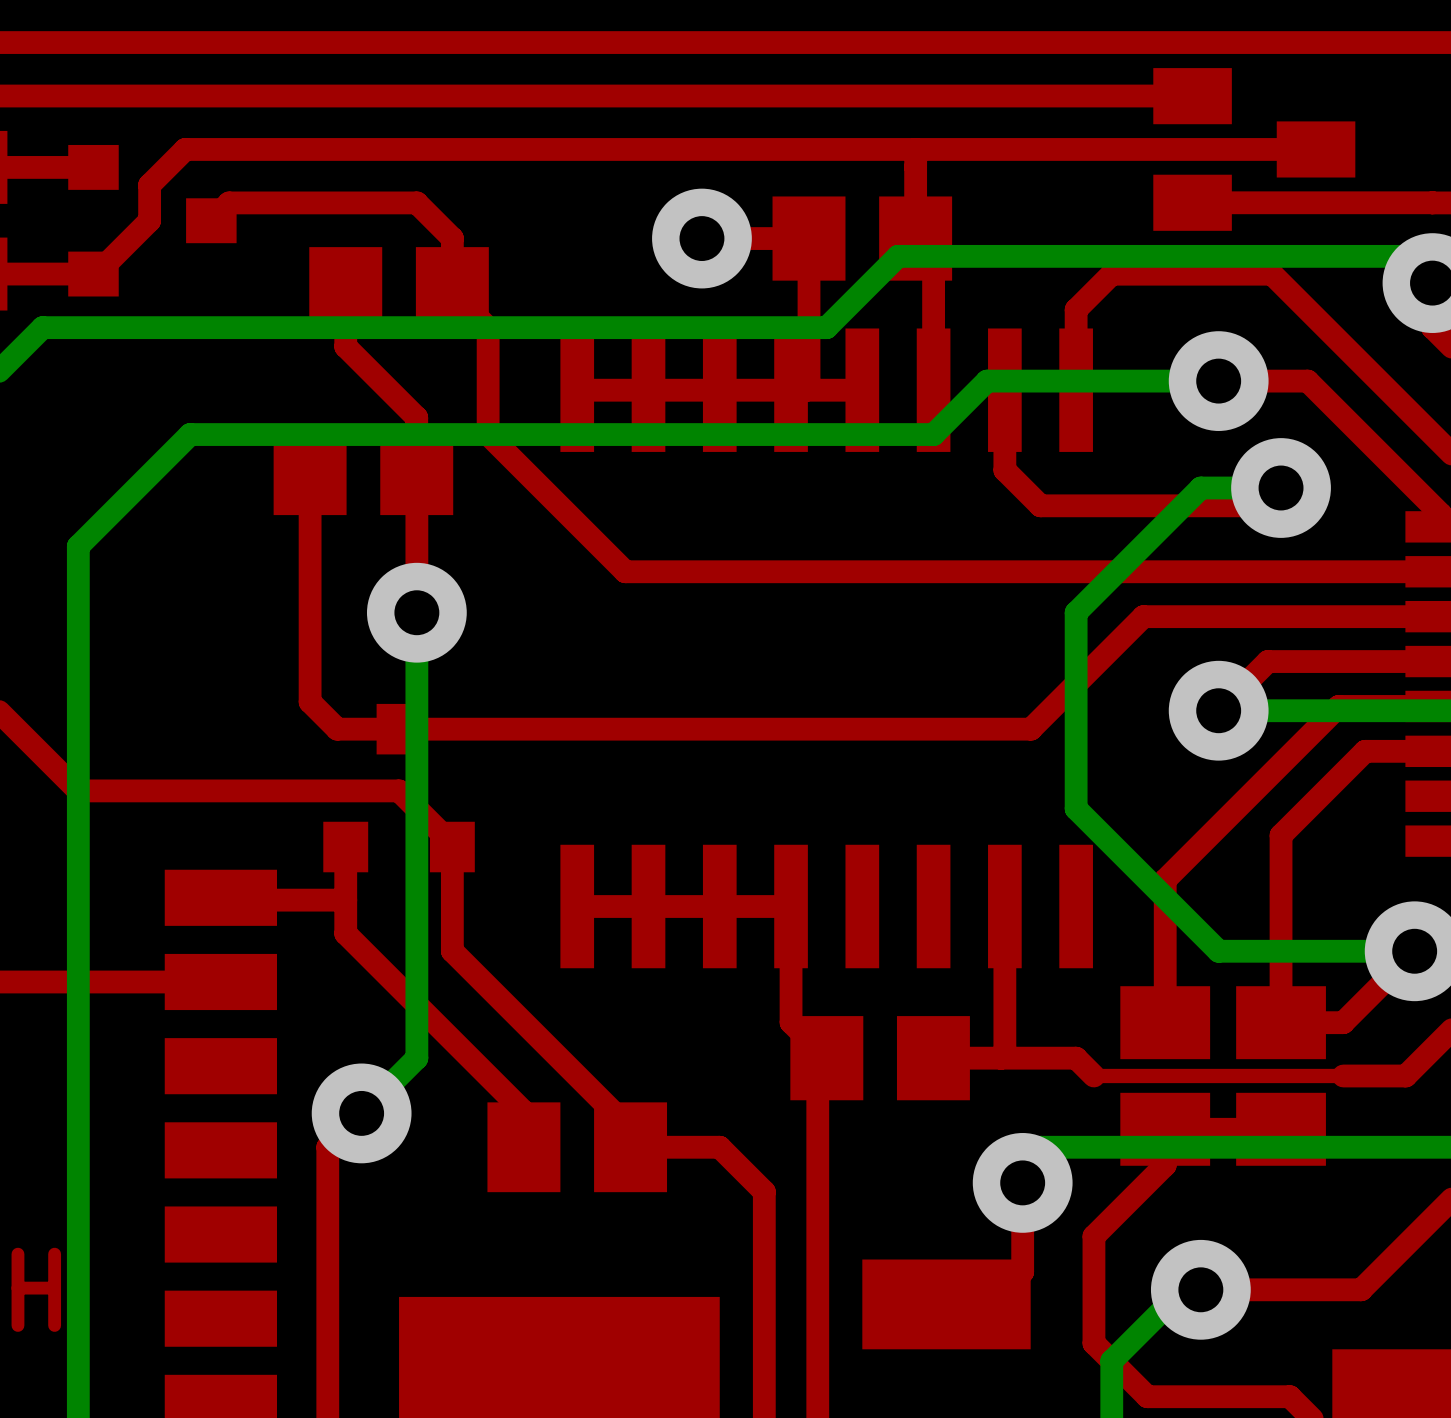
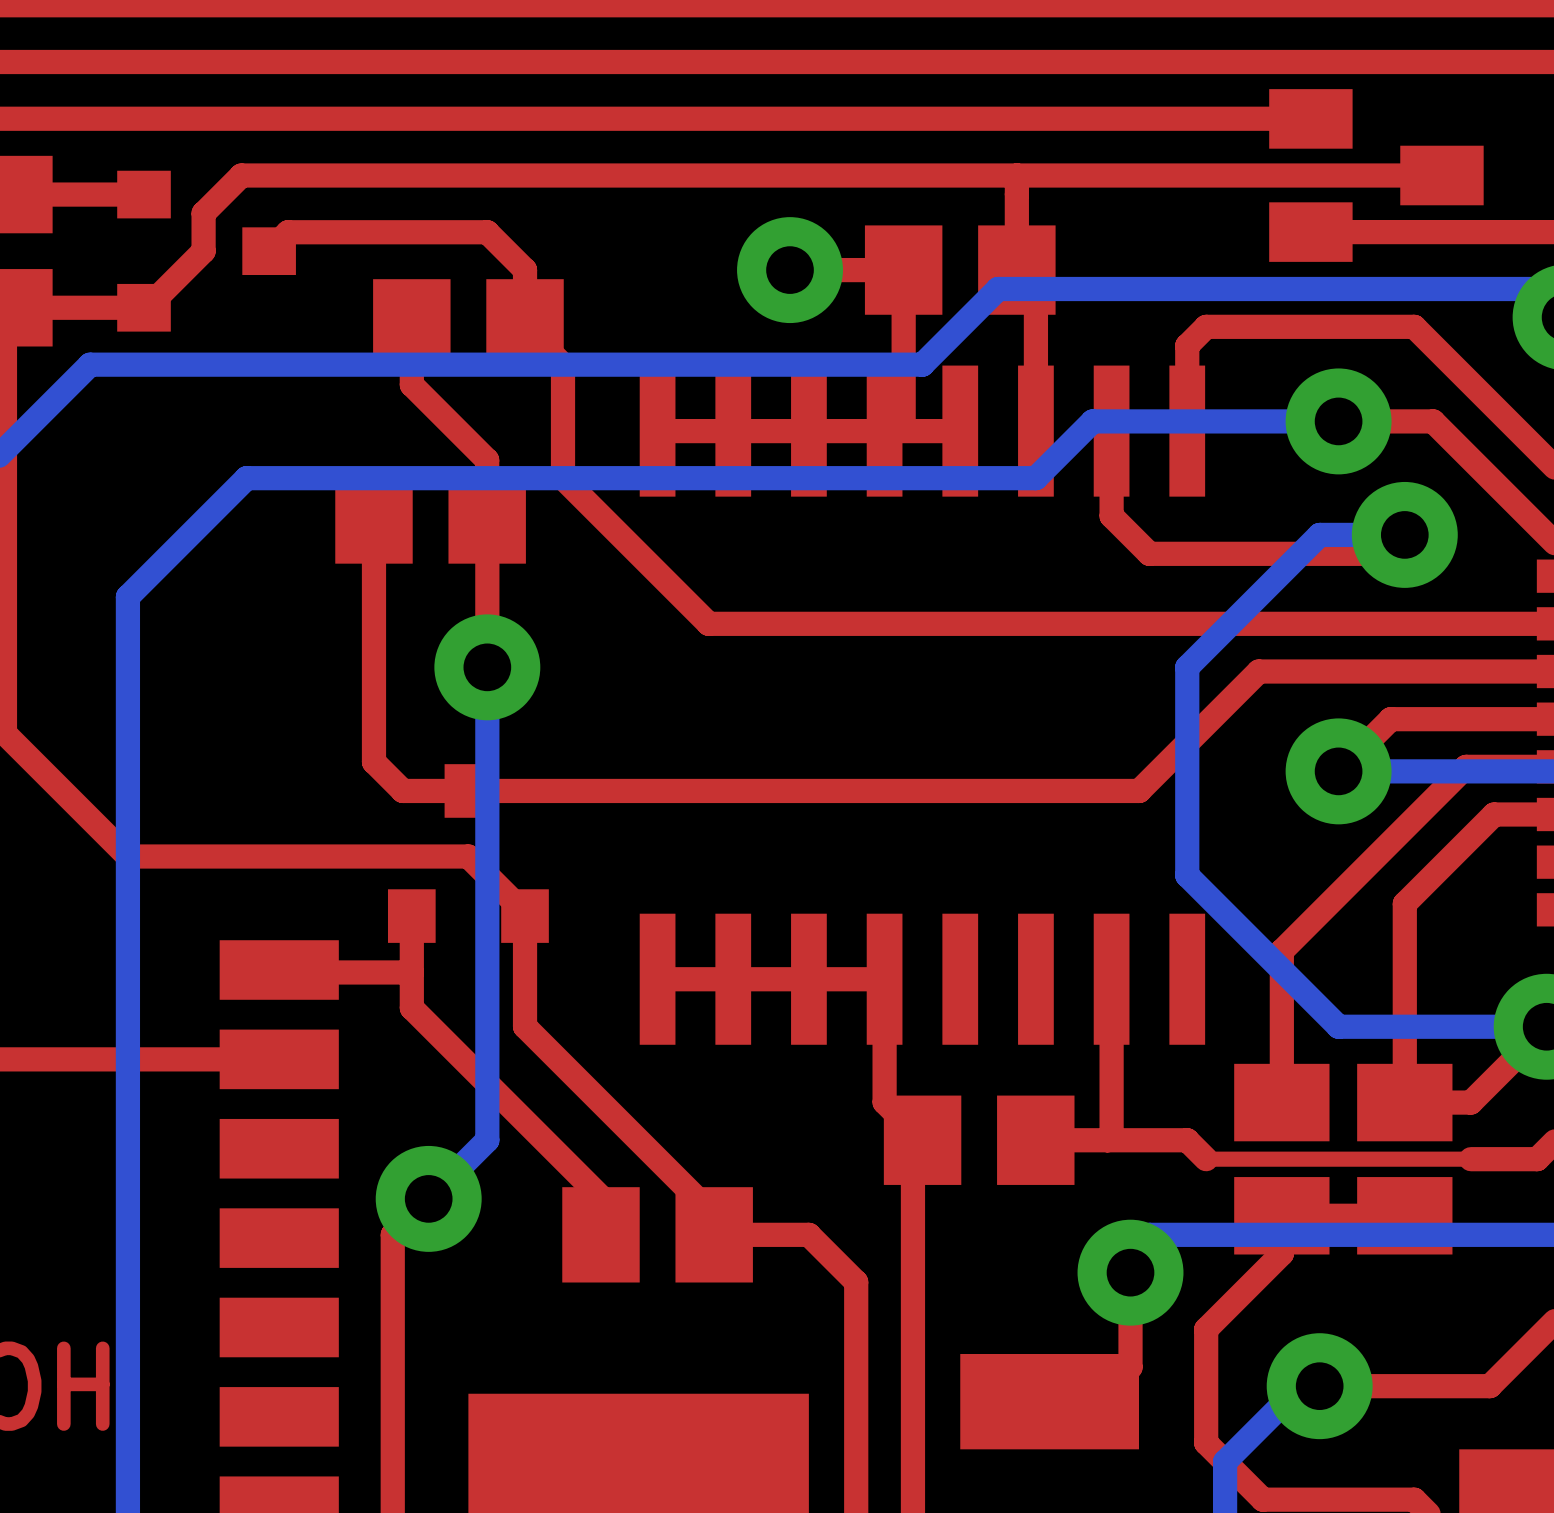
top track: (1289, 292) (1272, 274) (1111, 274) (1093, 292) -> (1414, 326) (1206, 326)

